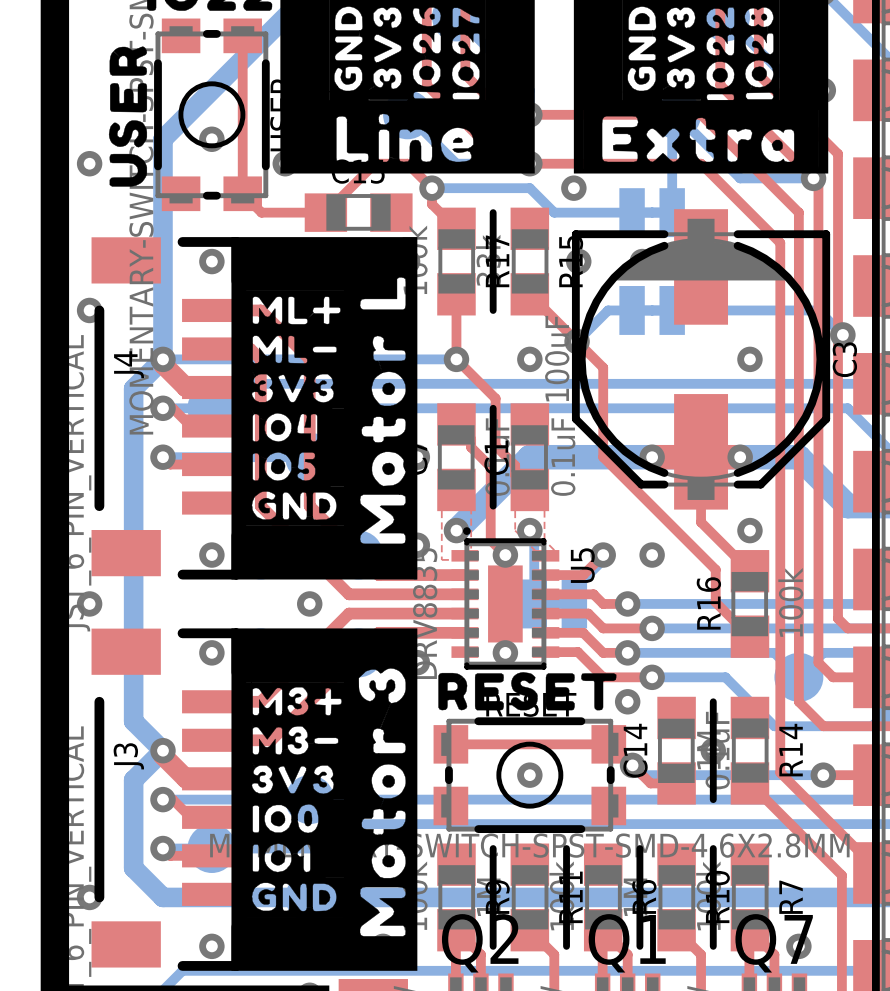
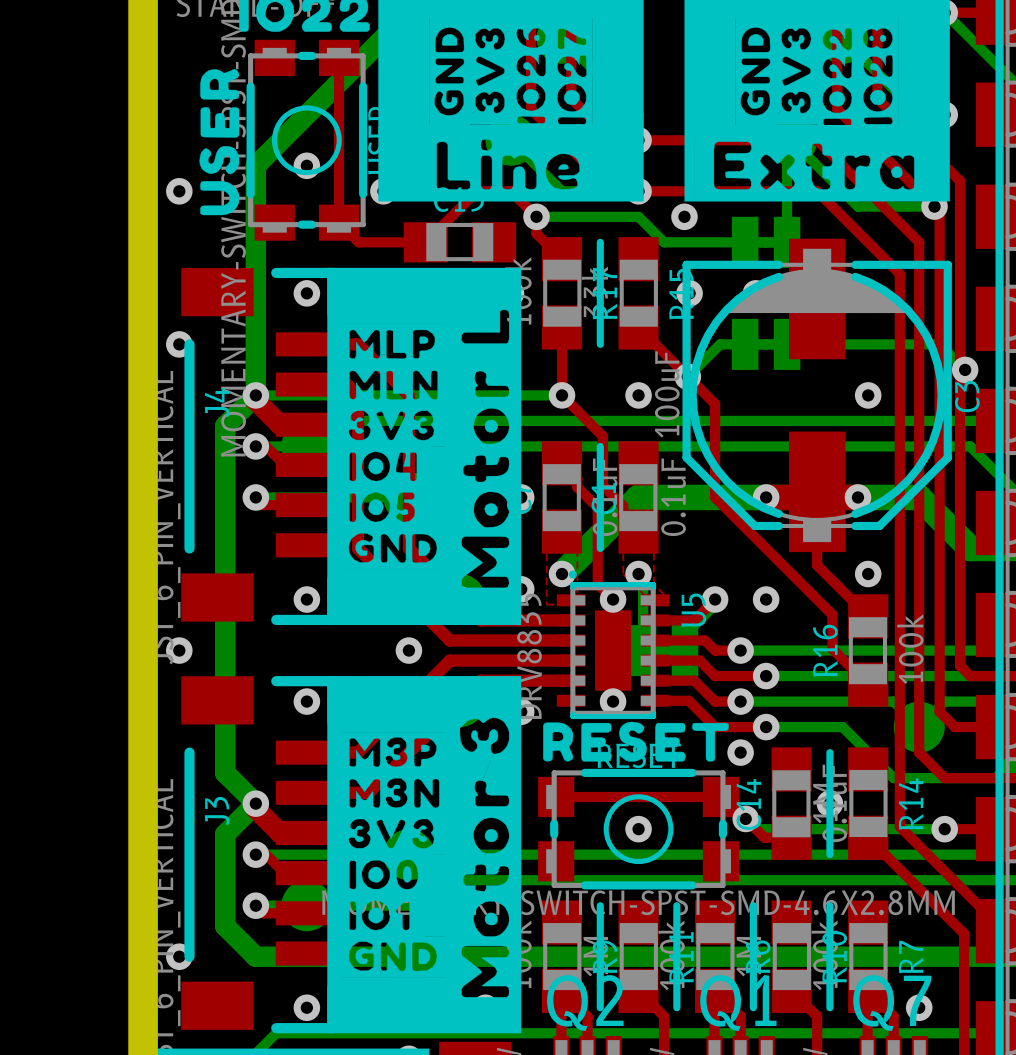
drawing shape: [240, 290, 351, 331] -> [337, 323, 451, 366]
drawing shape: [240, 329, 348, 370] -> [337, 364, 453, 406]
drawing shape: [240, 681, 352, 722] -> [337, 731, 452, 774]
drawing shape: [240, 721, 349, 761] -> [337, 772, 455, 815]

